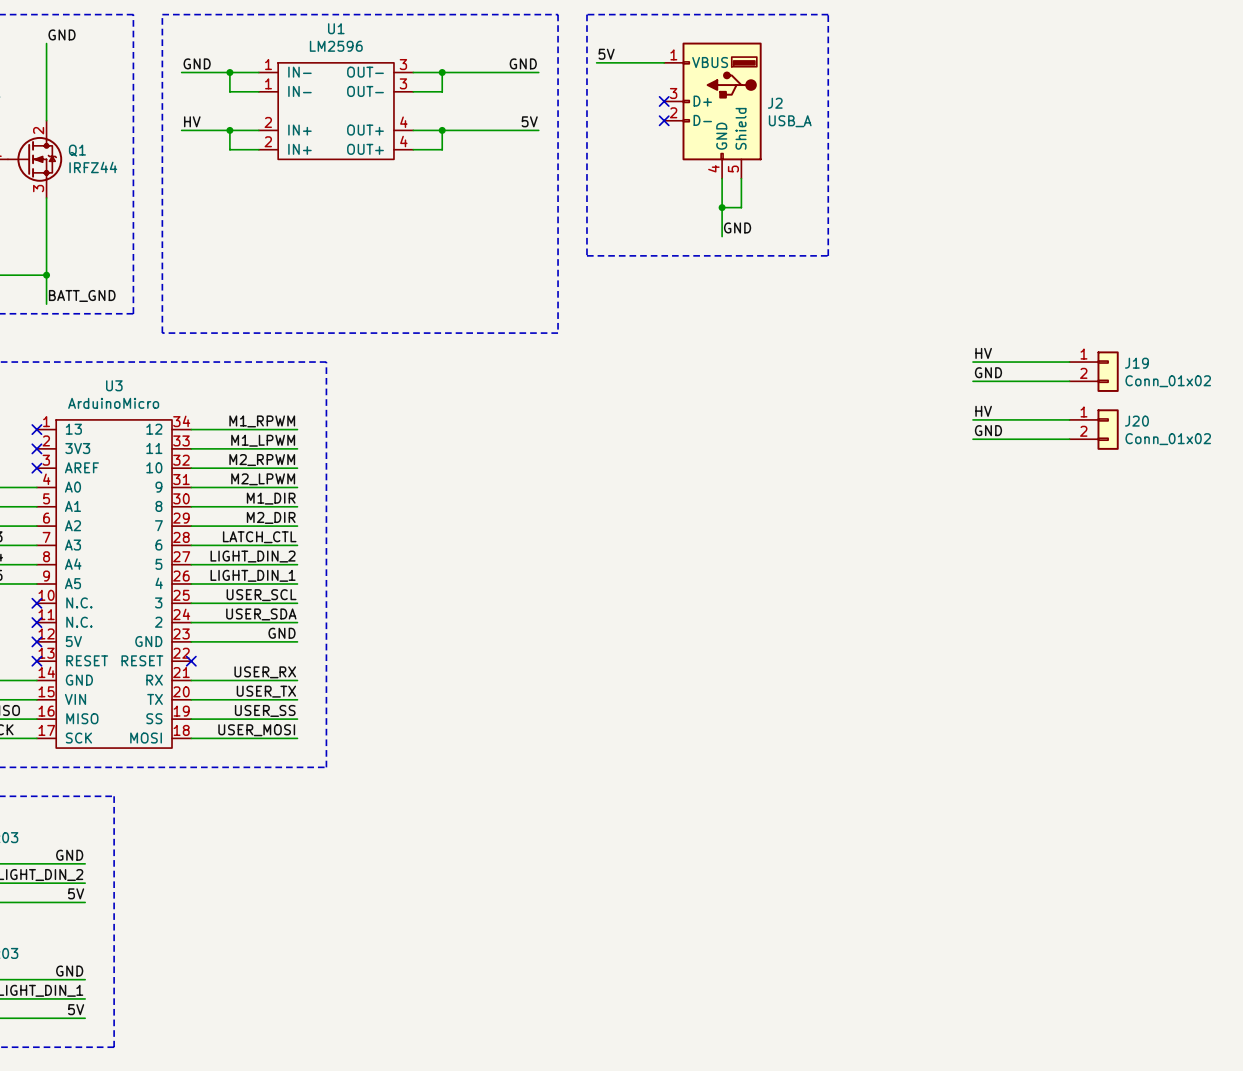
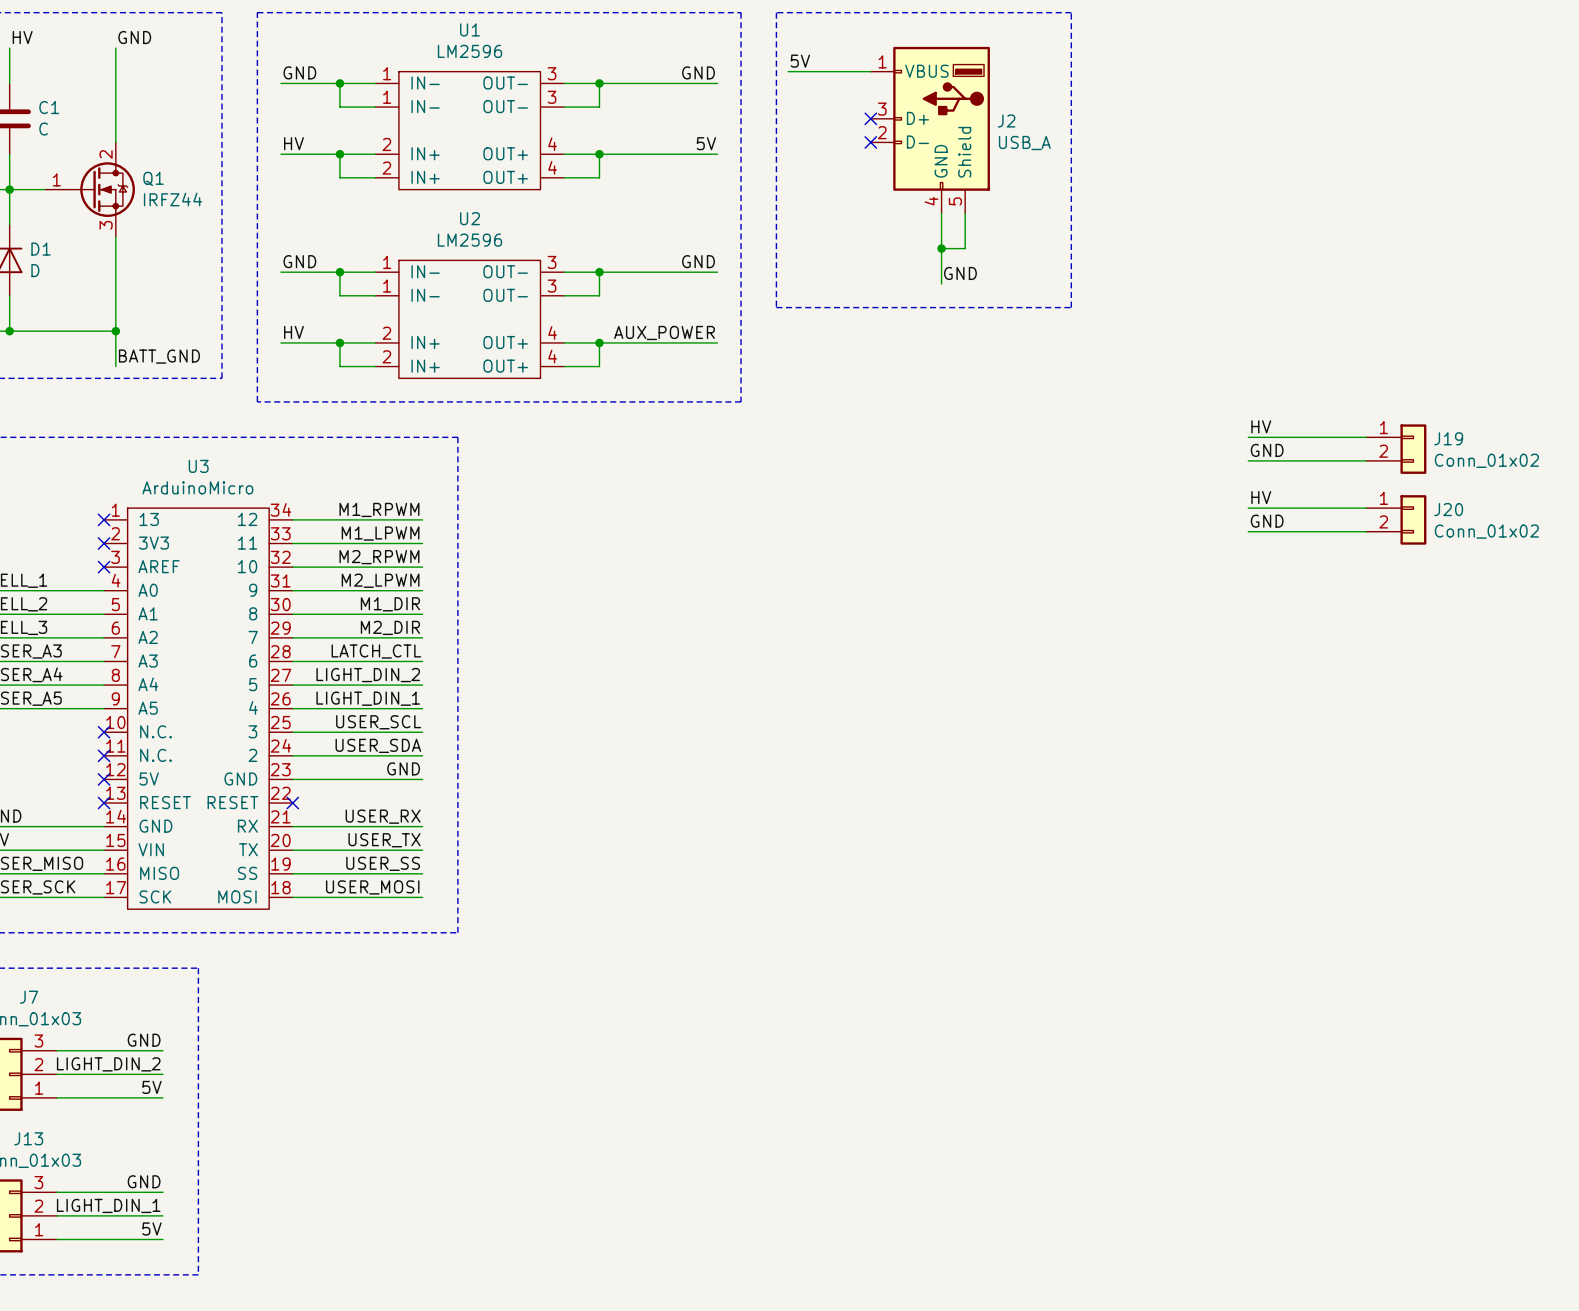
label: none -> GND (299, 261)
label: none -> GND (698, 261)
wire: none -> (280, 272) (375, 272)
wire: none -> (339, 272) (339, 295) (375, 295)
junction: none -> (339, 272)
wire: none -> (564, 272) (717, 272)
wire: none -> (599, 272) (599, 295) (564, 295)
junction: none -> (599, 272)
U2: none -> LM2596 (469, 319)
label: none -> HV (293, 332)
label: none -> AUX_POWER (664, 333)
wire: none -> (280, 342) (375, 342)
wire: none -> (339, 342) (339, 366) (375, 366)
junction: none -> (339, 342)
wire: none -> (564, 342) (717, 342)
wire: none -> (599, 342) (599, 366) (564, 366)
junction: none -> (599, 342)

